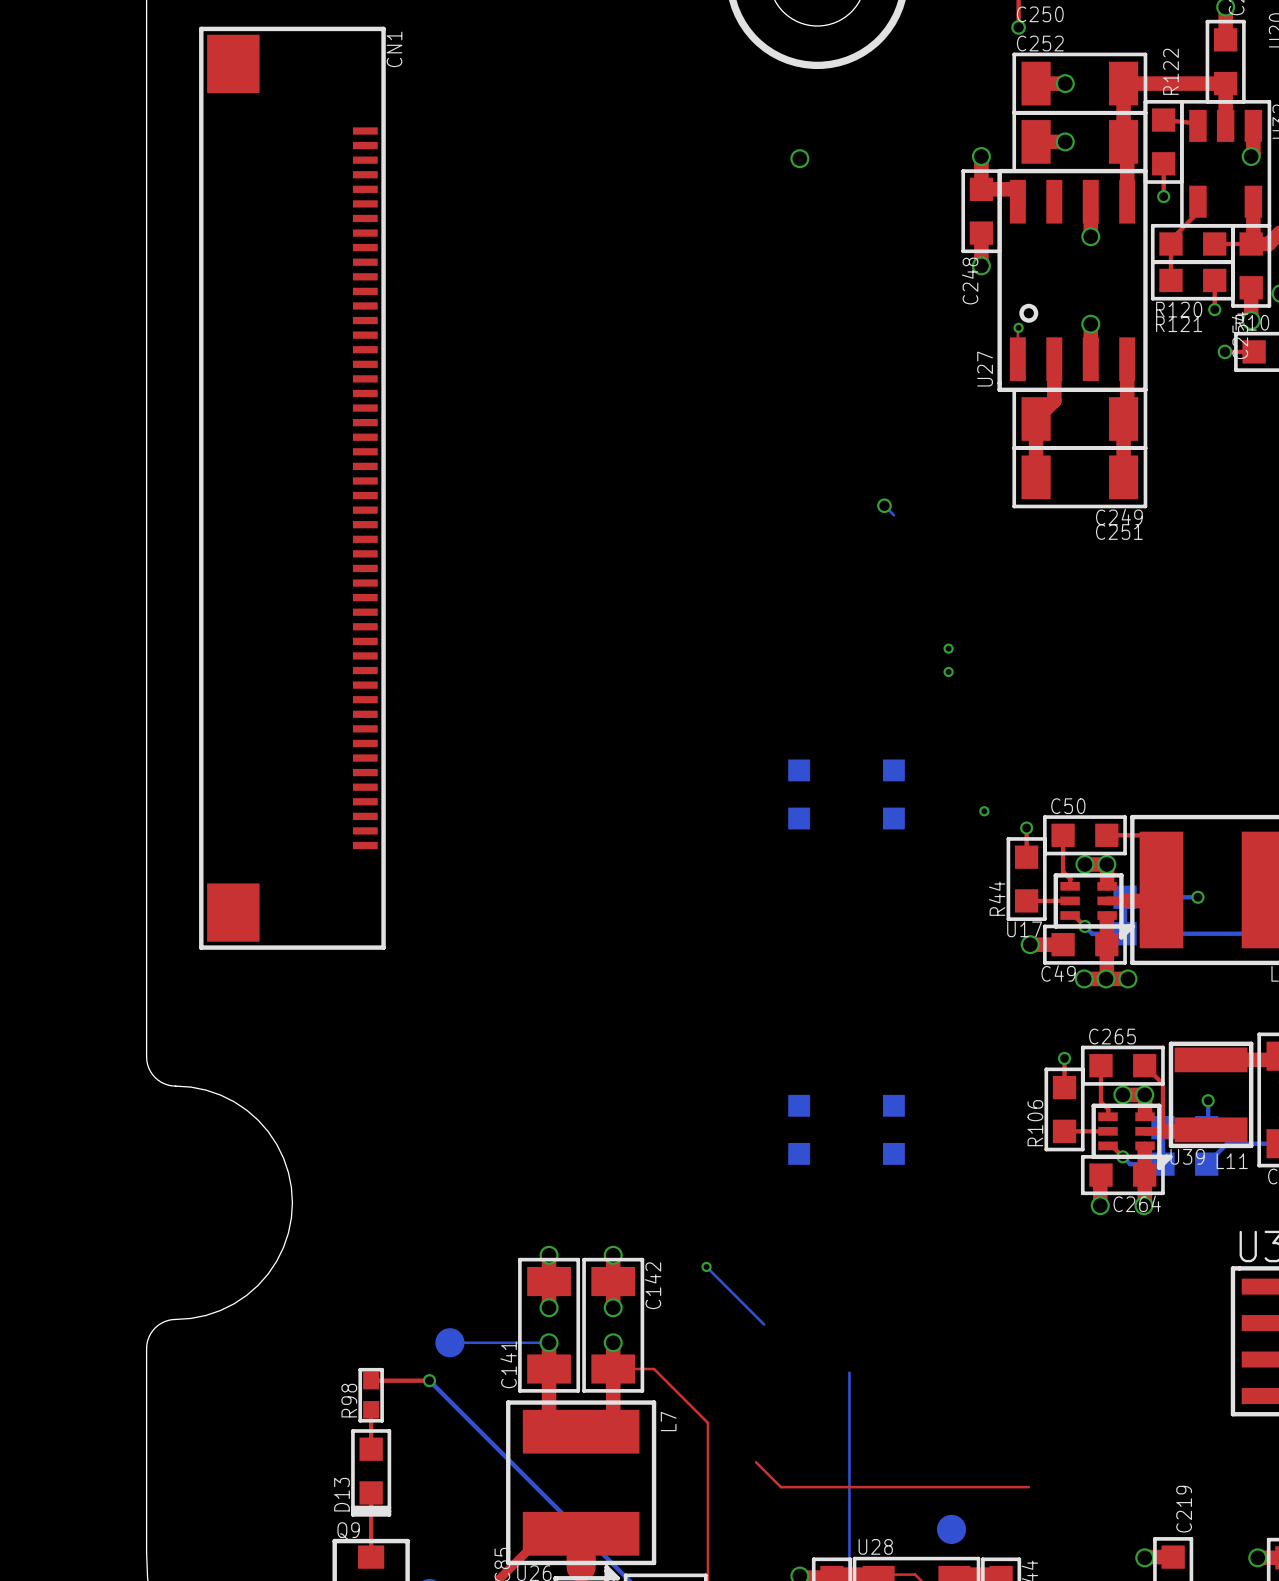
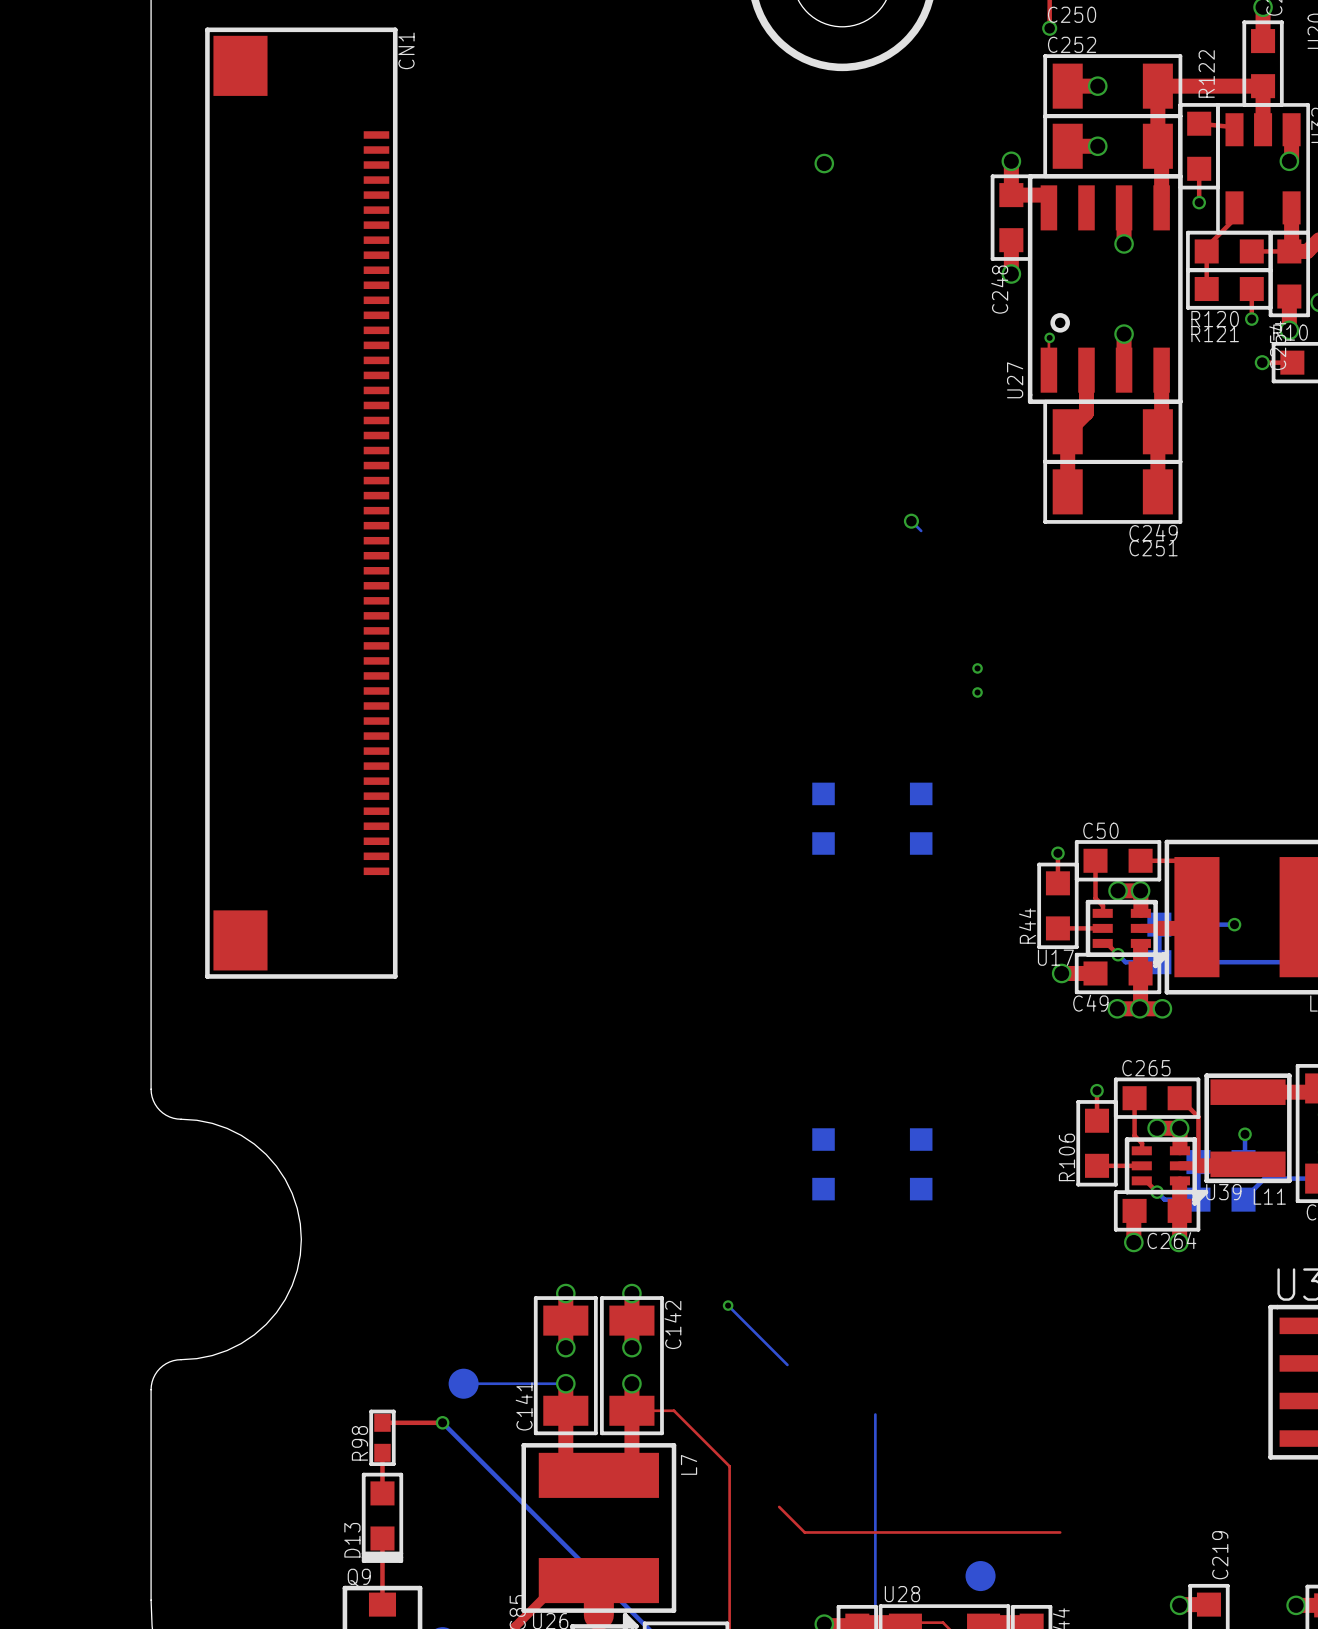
via: (984, 811) -> none

